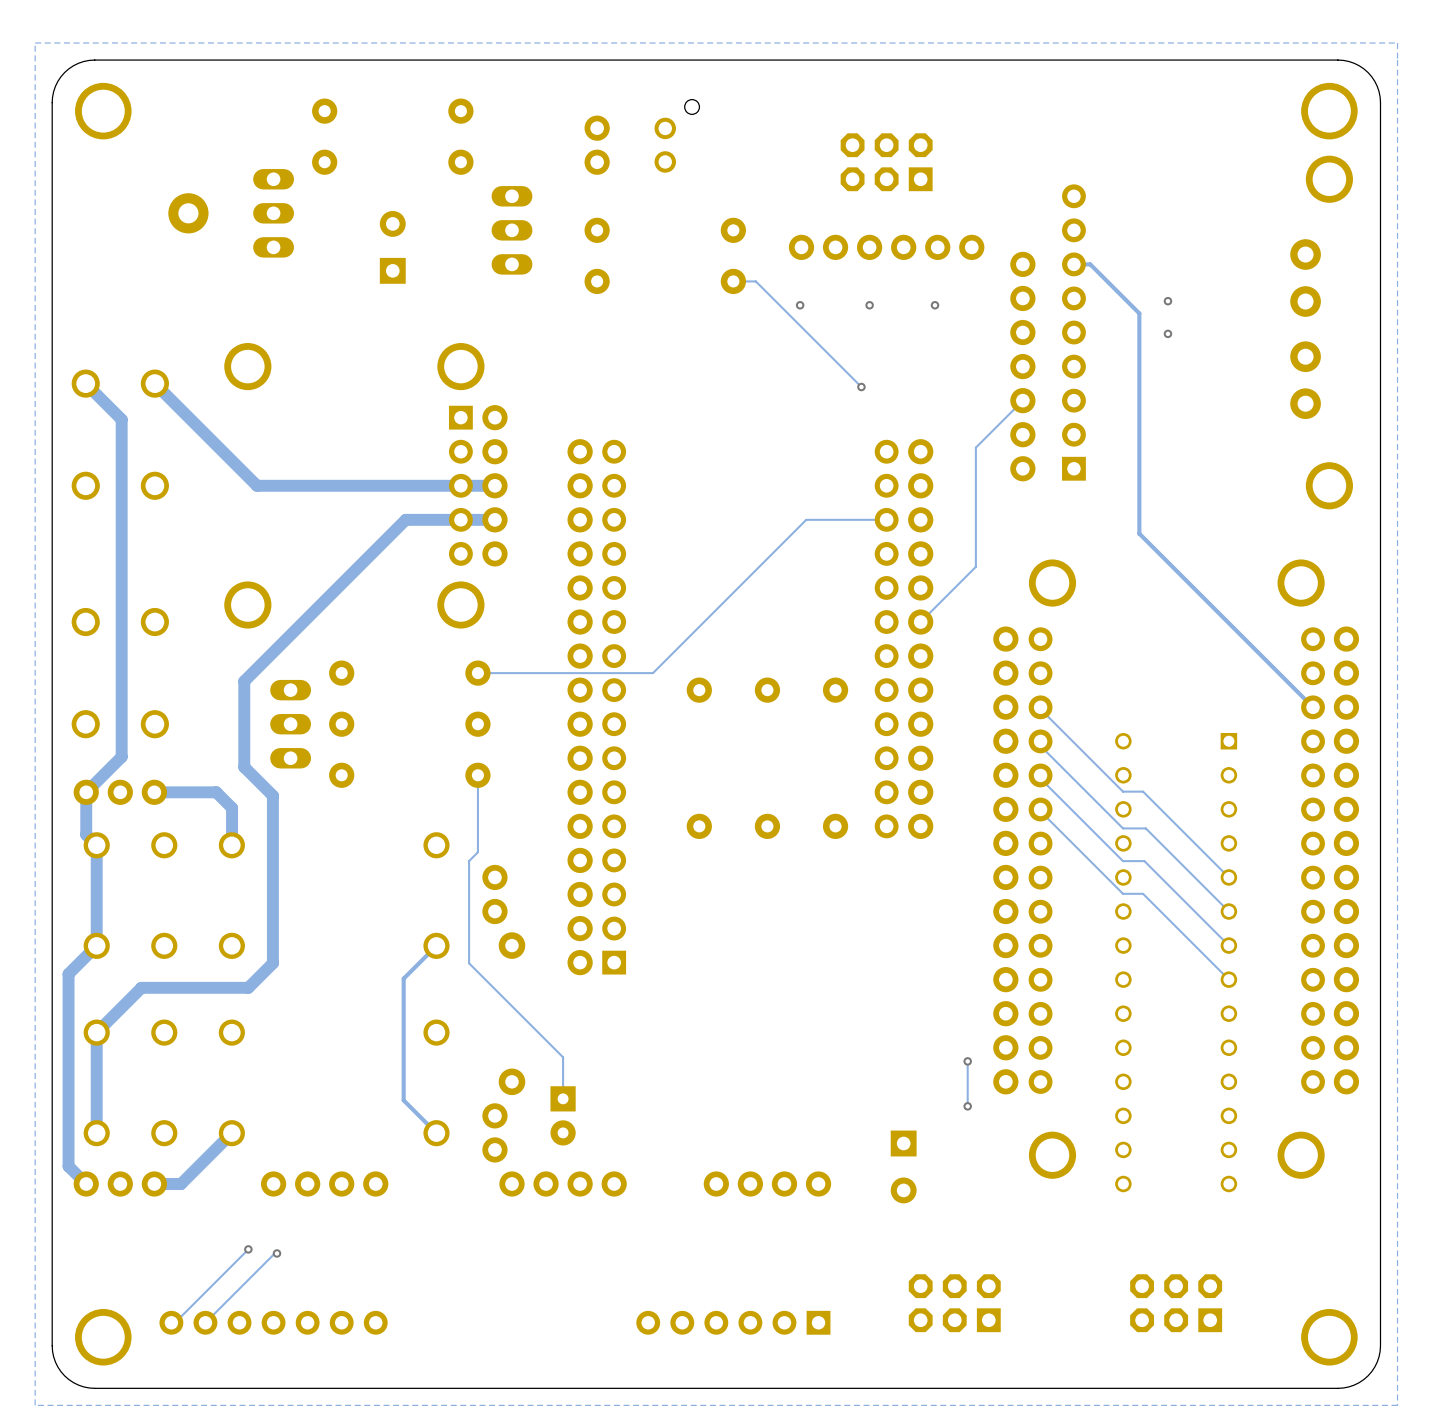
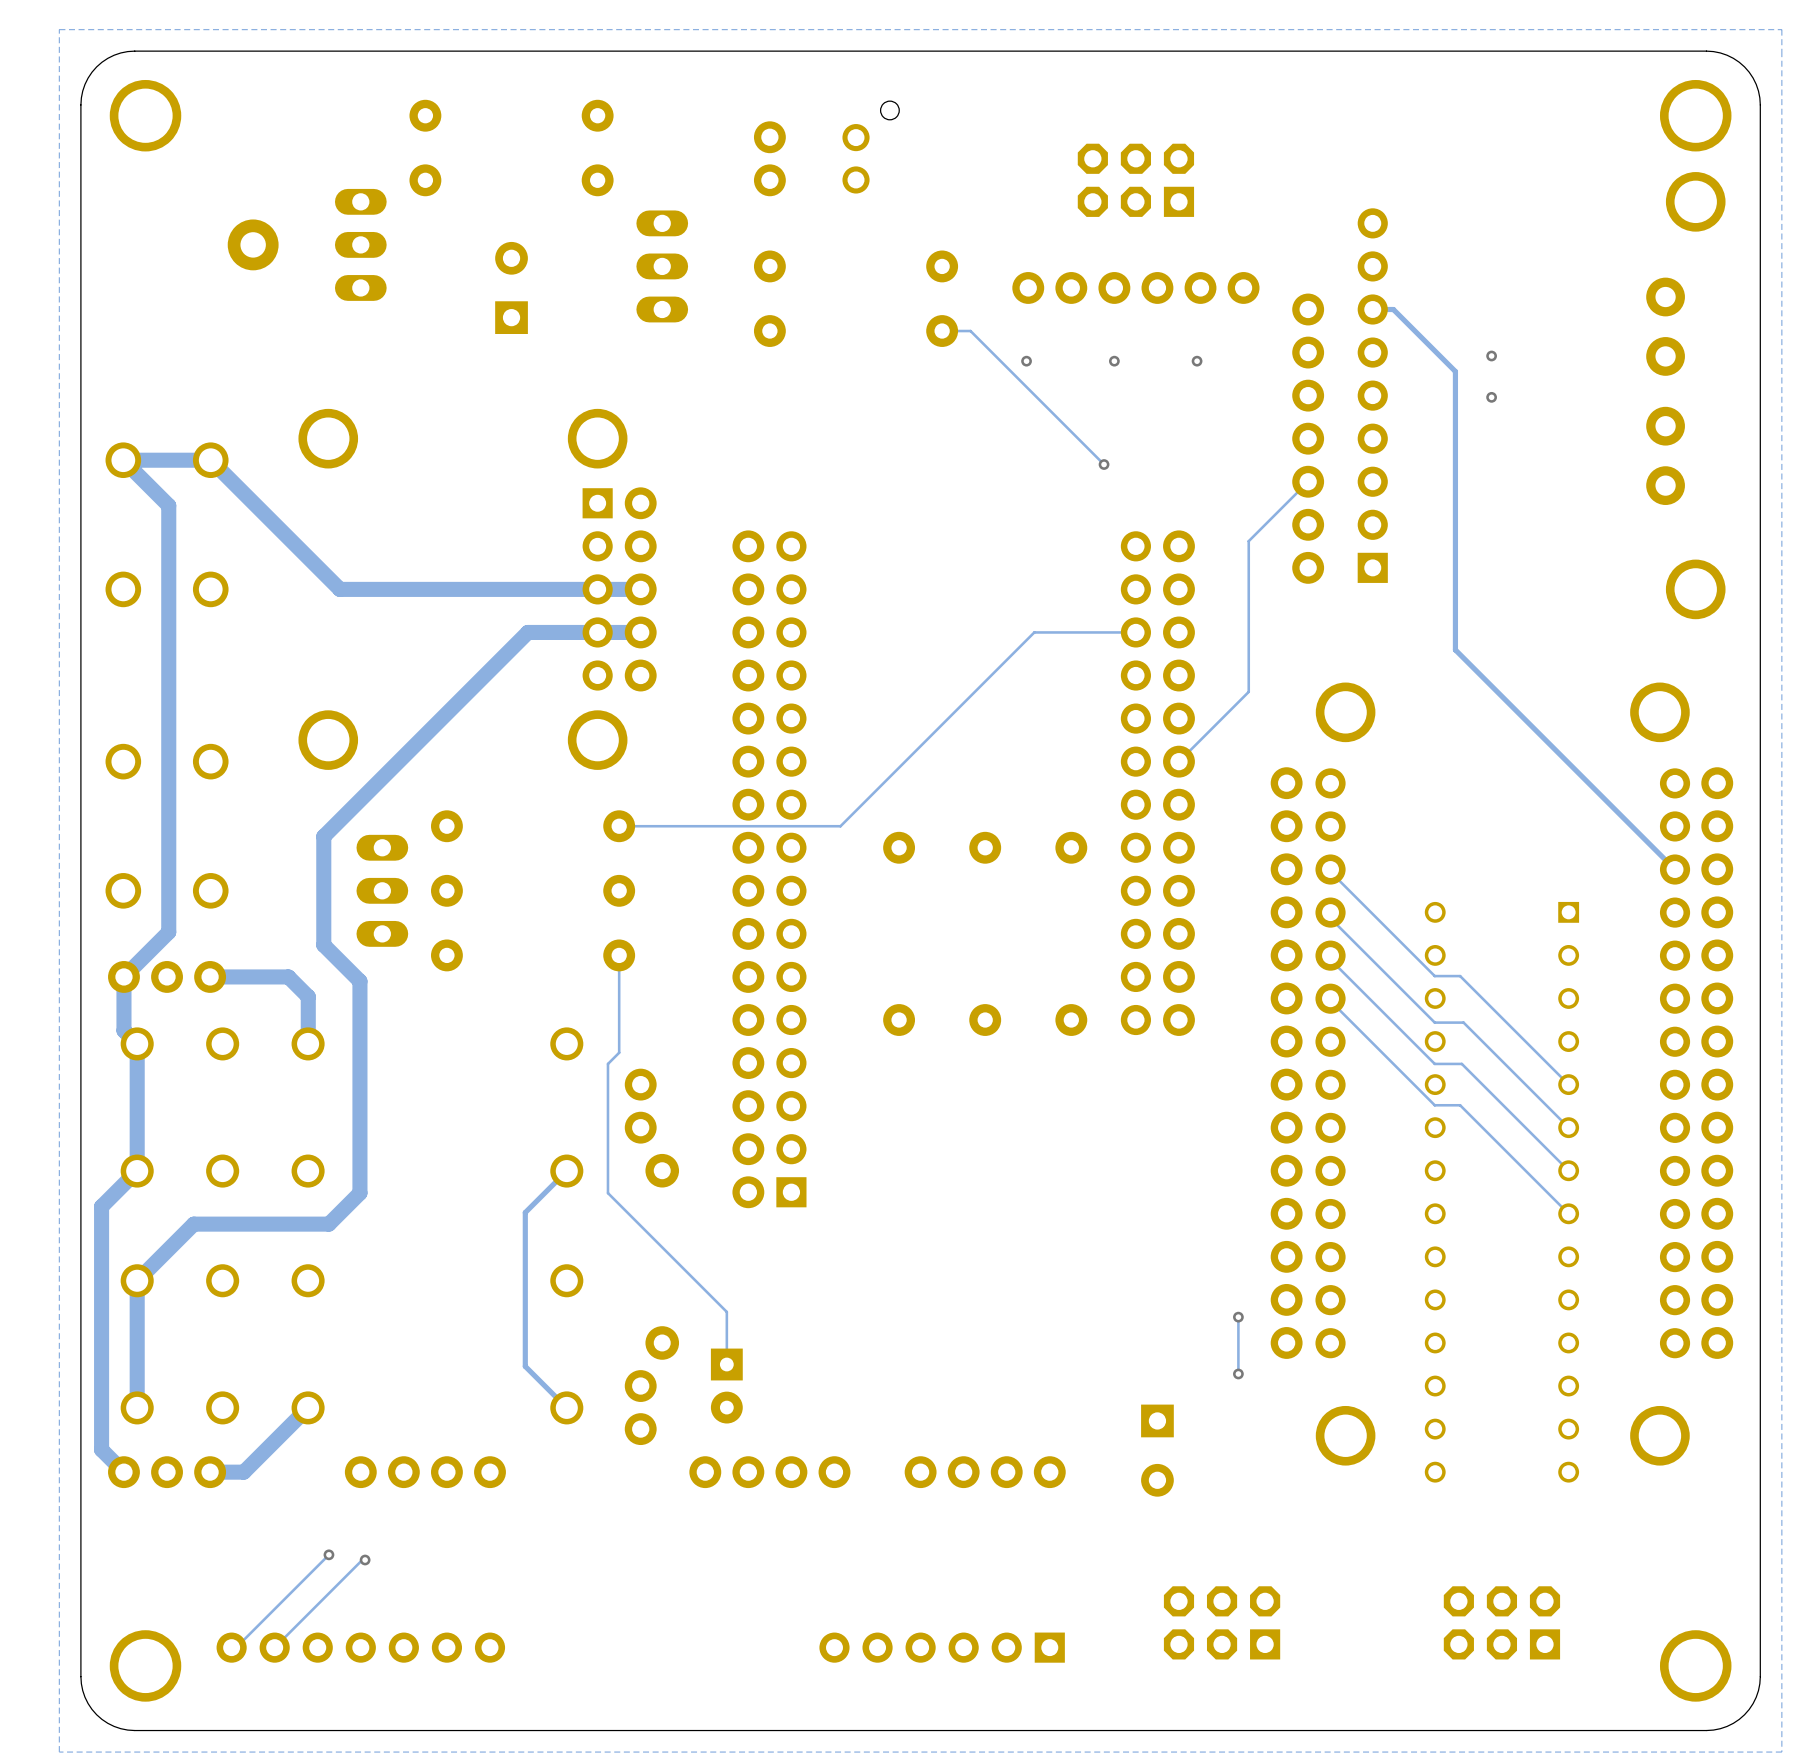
track: none -> (210, 460) (123, 460)
part position: (563, 1183) -> (769, 1472)

